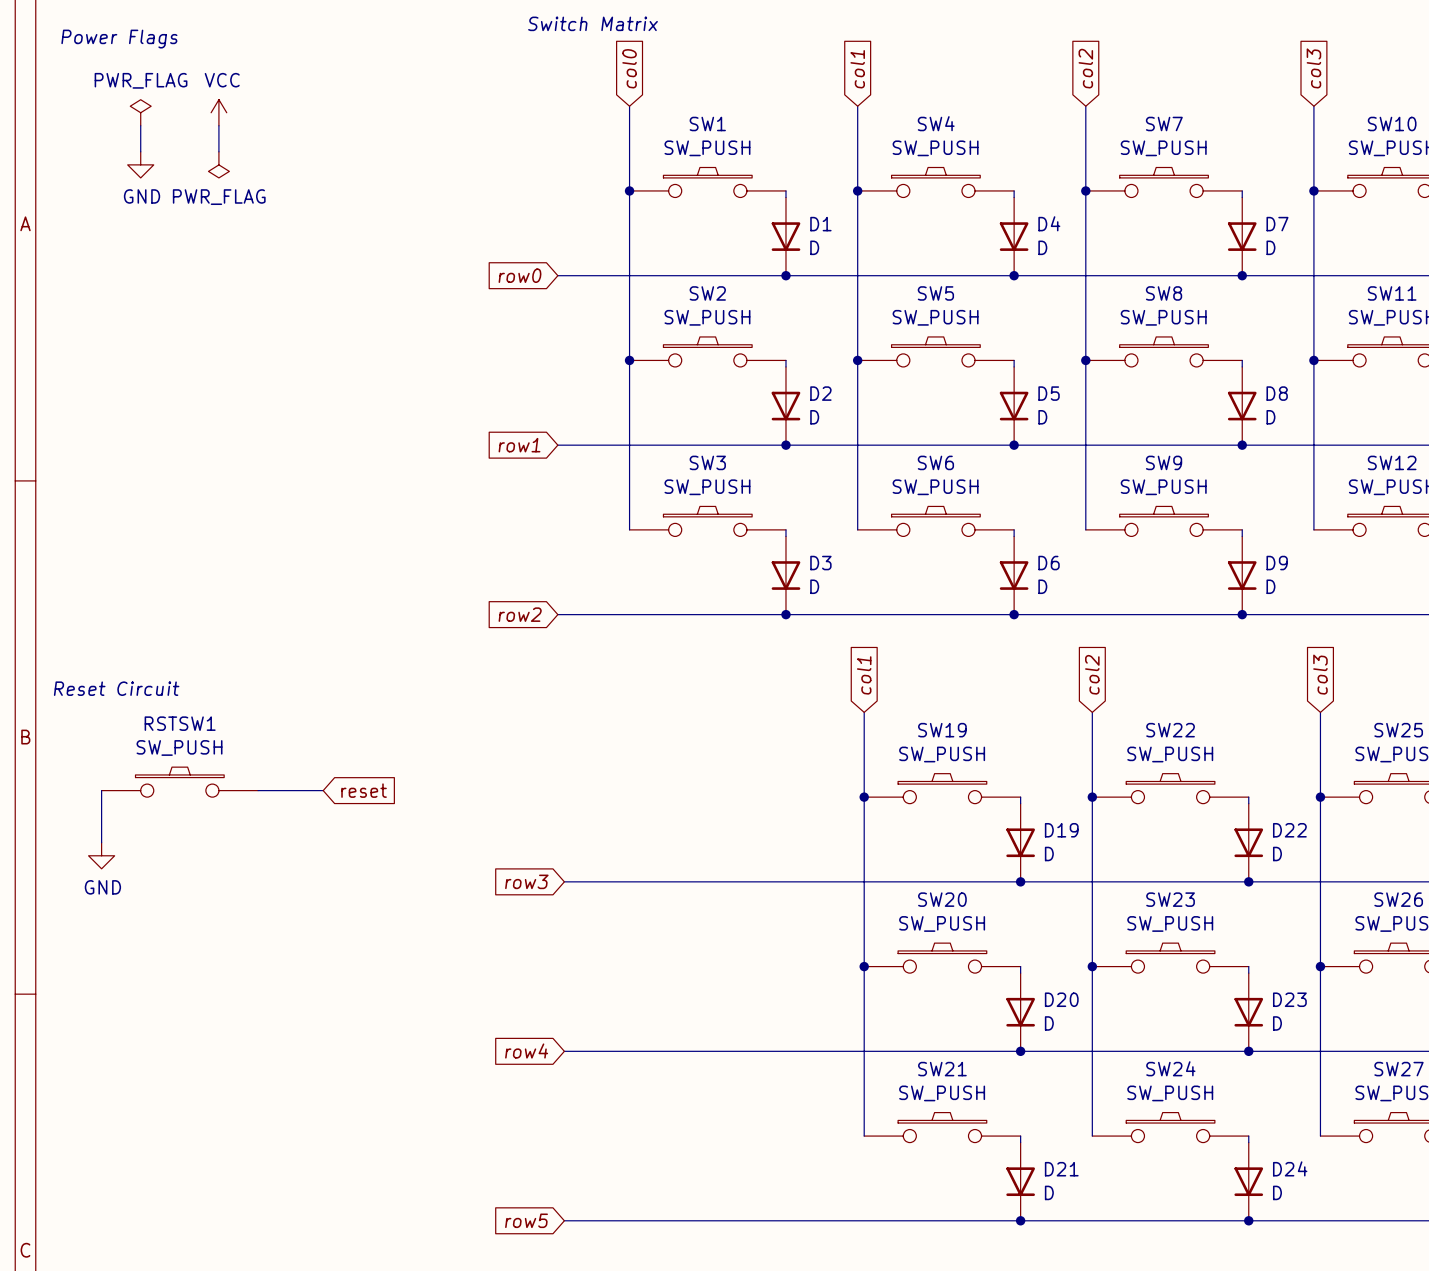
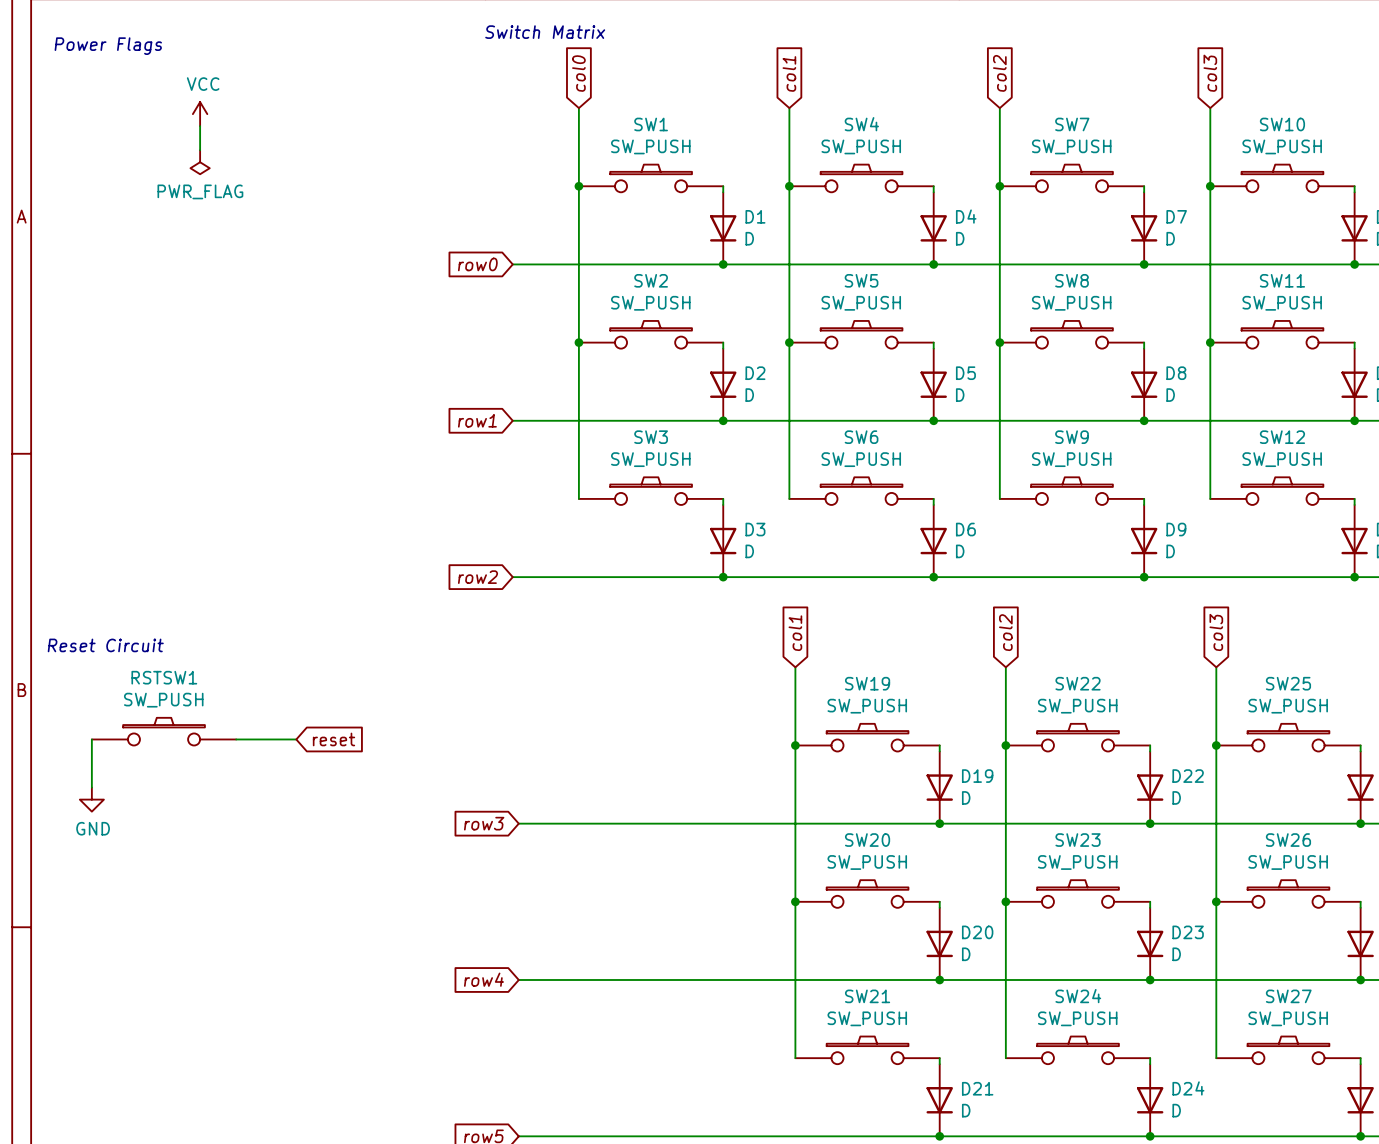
power symbol: PWR_FLAG (140, 112) -> none
wire: (140, 125) (140, 151) -> none
power symbol: GND (140, 164) -> none

